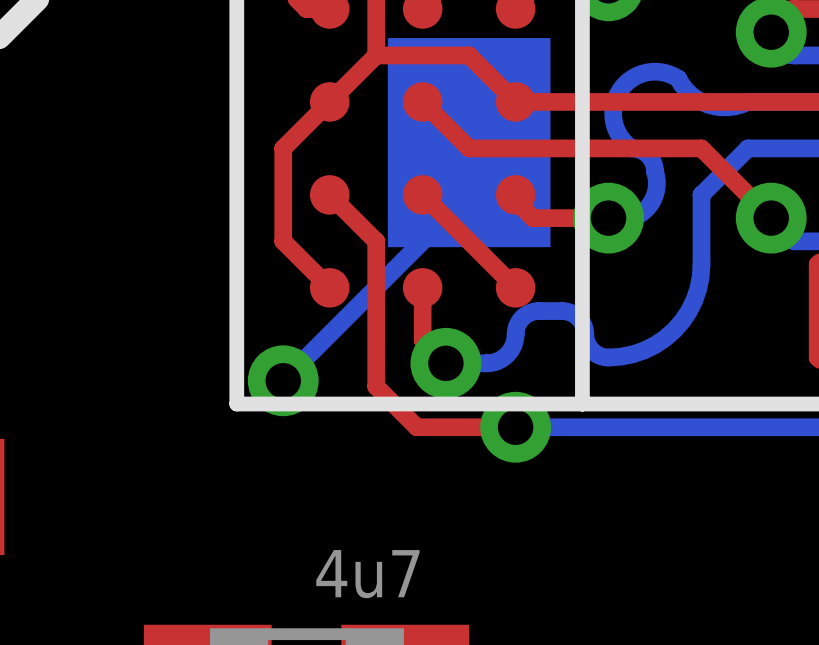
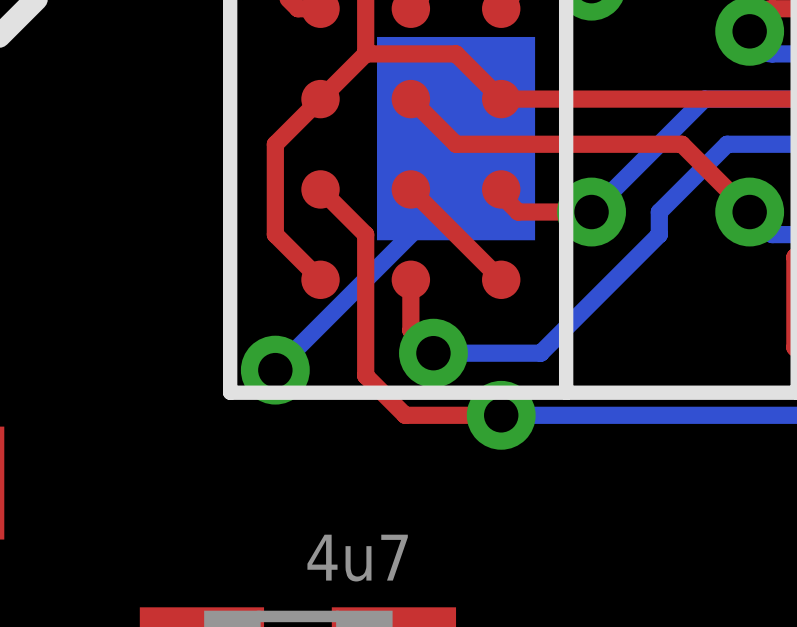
bottom track: (747, 101) (728, 107) (708, 104) (690, 94) (678, 78) (663, 72) (641, 73) (627, 82) (615, 100) (613, 121) (623, 141) (631, 148) (643, 151) (651, 160) (656, 176) (656, 190) (650, 203) (640, 213) (631, 218) (608, 218) -> (727, 99) (704, 99) (591, 212)
bottom track: (701, 194) (701, 264) (698, 288) (689, 311) (674, 330) (665, 338) (655, 345) (632, 354) (602, 356) (594, 352) (588, 345) (583, 325) (576, 315) (565, 311) (535, 311) (524, 315) (518, 322) (513, 345) (507, 354) (497, 361) (486, 363) -> (681, 189) (659, 212) (659, 234) (540, 353) (472, 353)

